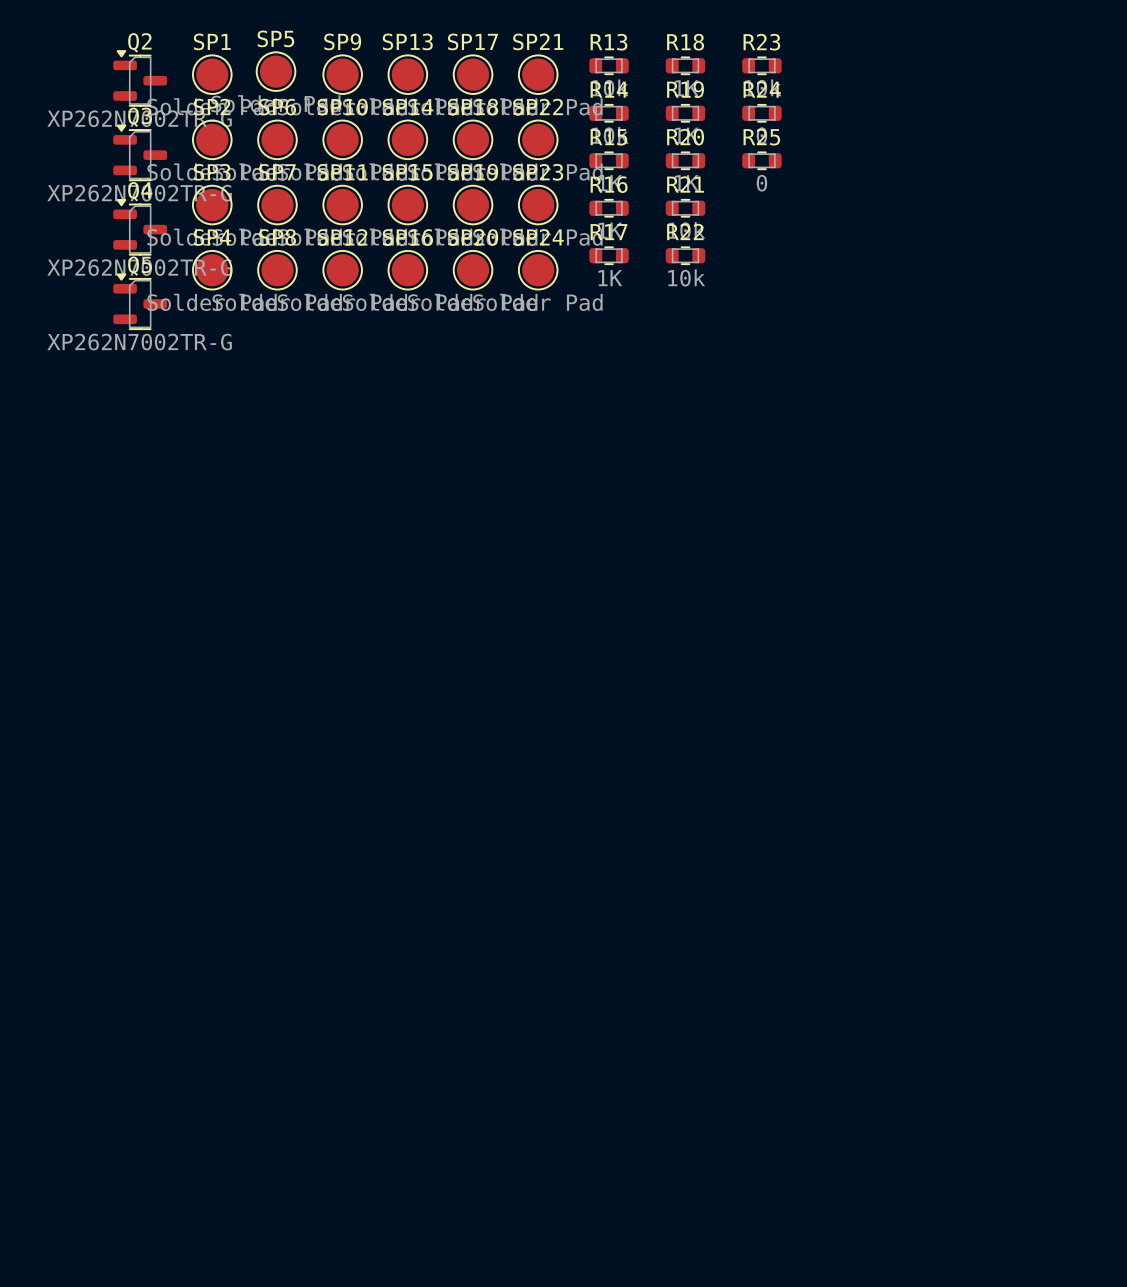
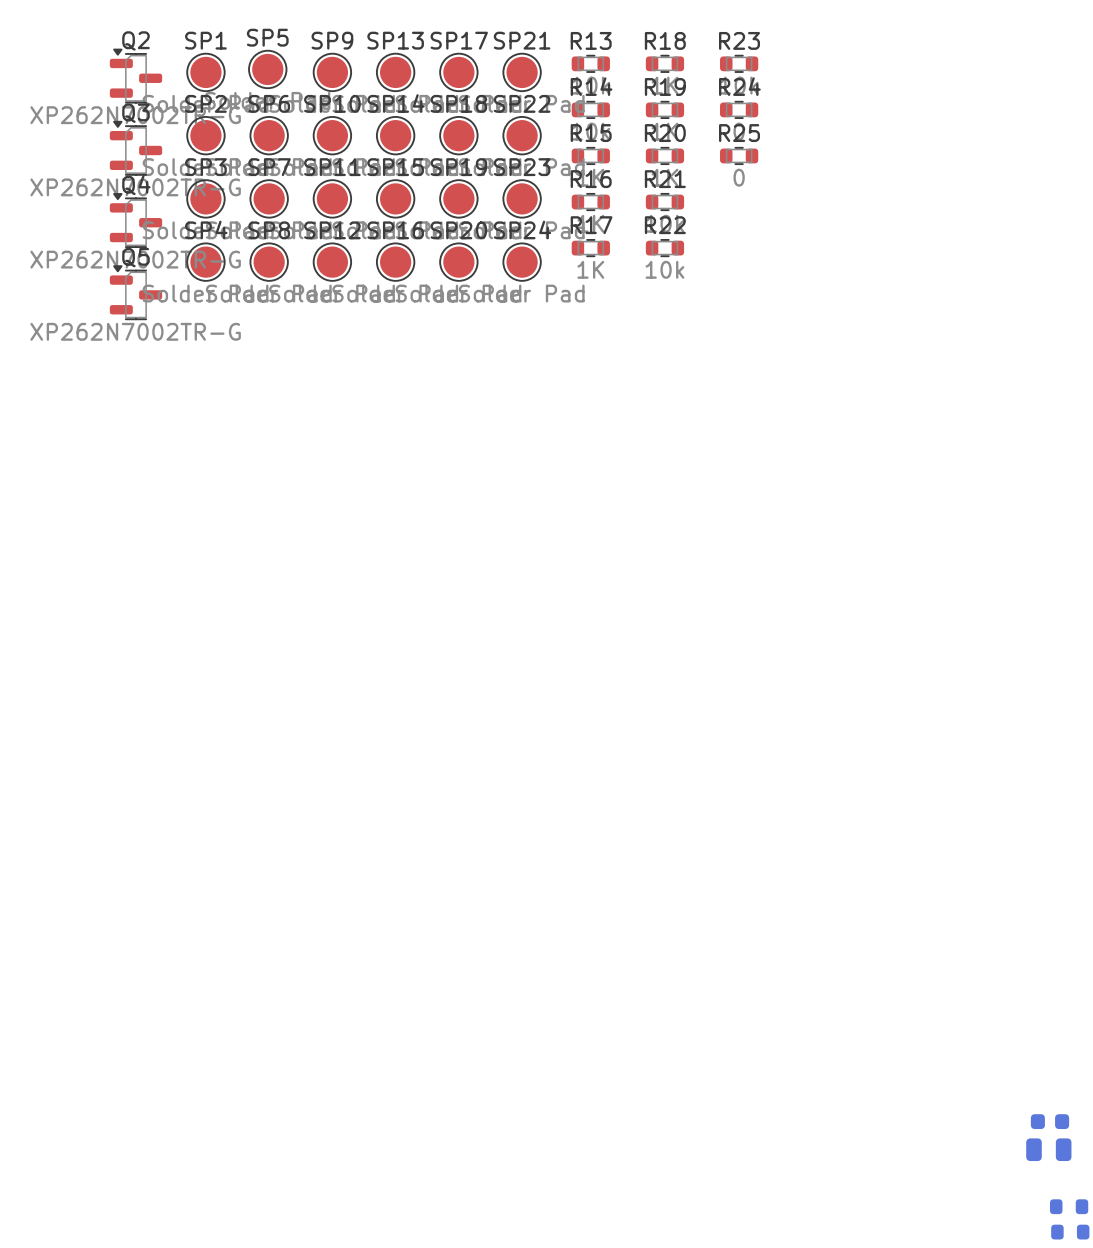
part: none -> (1049, 1121)
part: none -> (1048, 1149)
part: none -> (1069, 1206)
part: none -> (1070, 1232)

